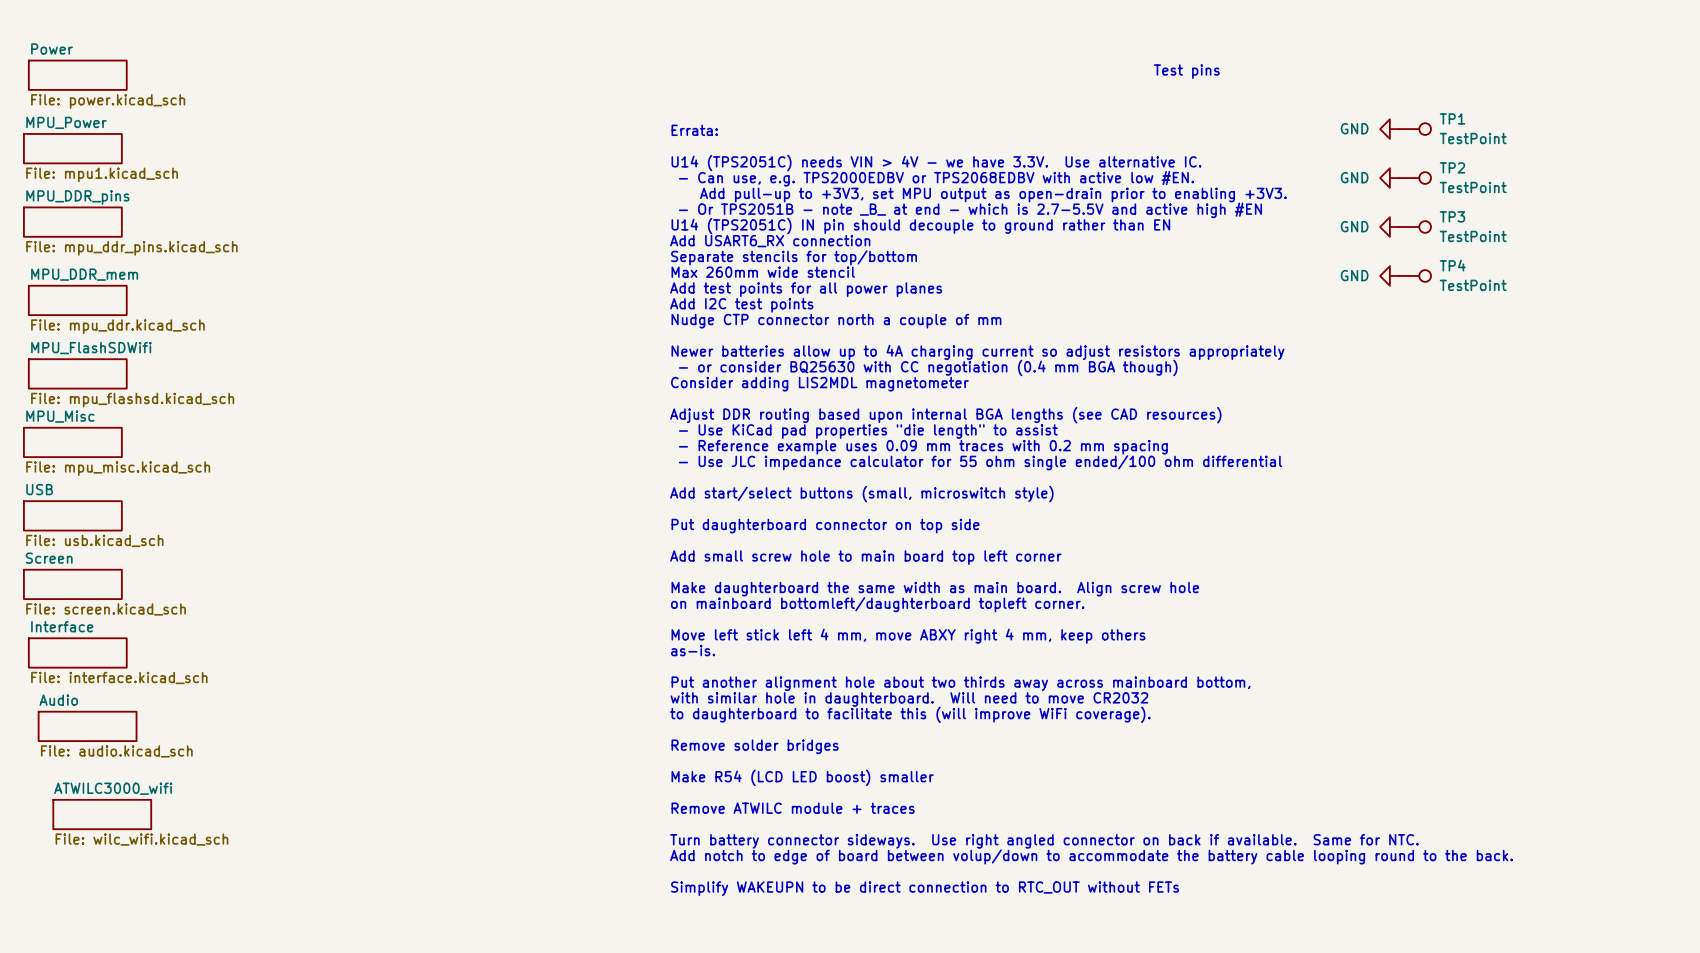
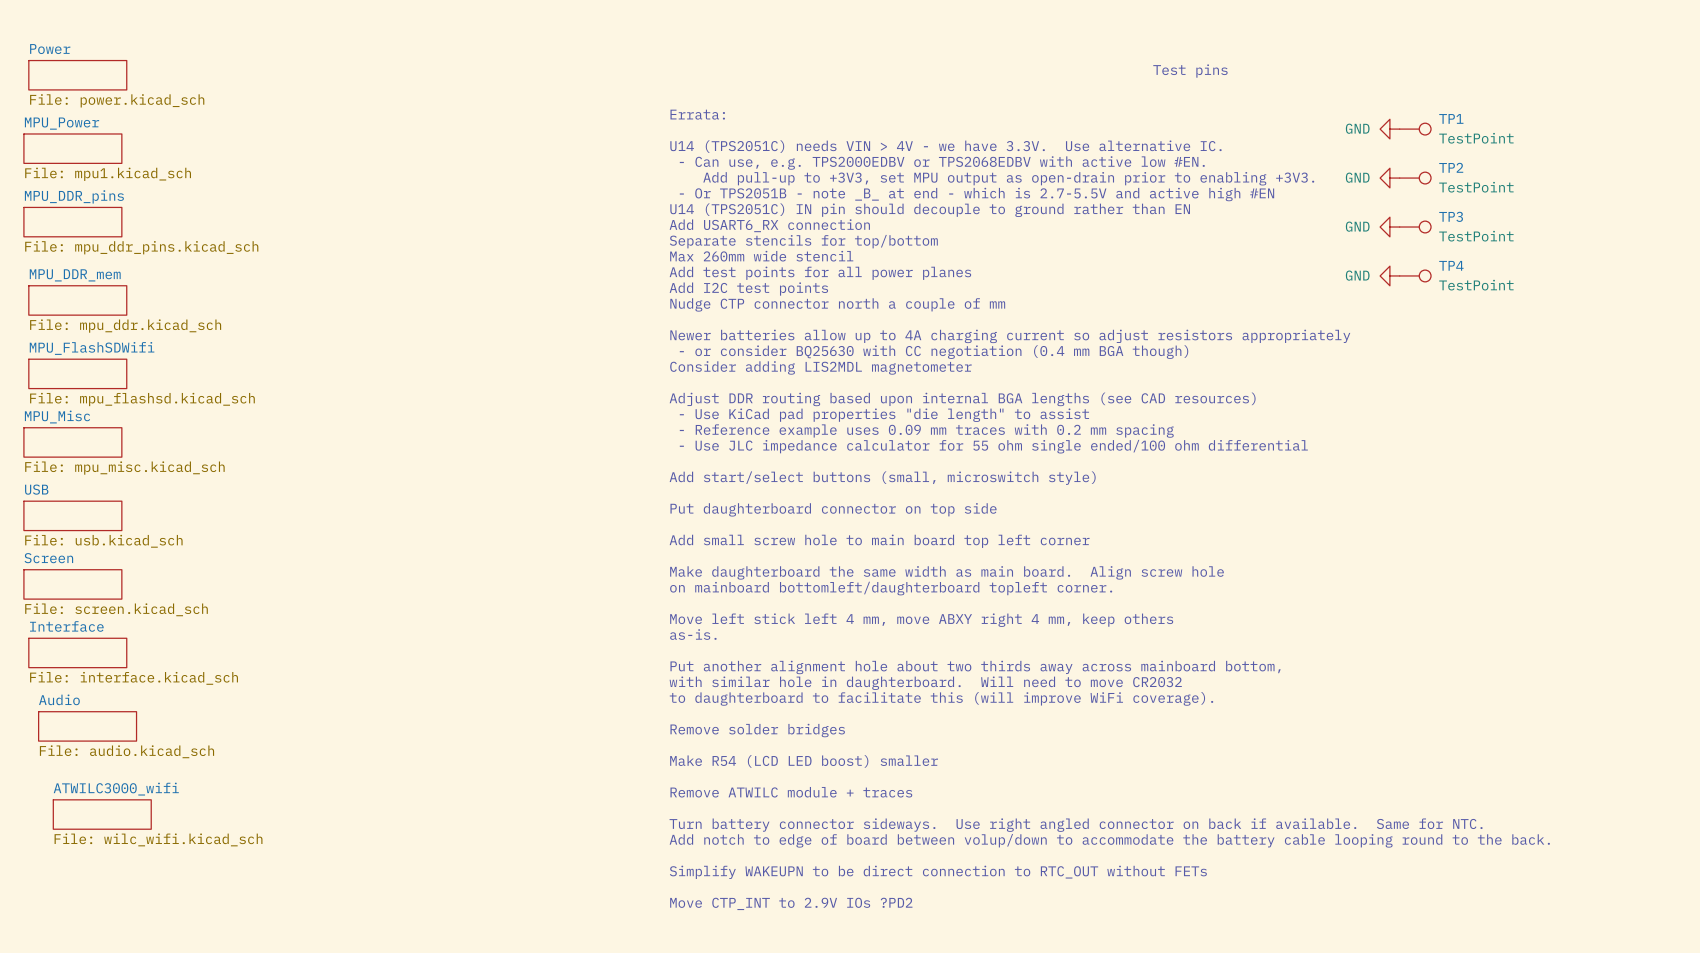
text position: Errata: (694, 130) -> Errata: (697, 114)
text: none -> U14 (TPS2051C) needs VIN > 4V - we have 3.3V. Use alternative IC. (945, 146)
text: U14 (TPS2051C) needs VIN > 4V - we have 3.3V. Use alternative IC. (936, 163) -> - Can use, e.g. TPS2000EDBV or TPS2068EDBV with active low #EN. (942, 162)
text: - Can use, e.g. TPS2000EDBV or TPS2068EDBV with active low #EN. (936, 178) -> Add pull-up to +3V3, set MPU output as open-drain prior to enabling +3V3. (1008, 178)
text: Add pull-up to +3V3, set MPU output as open-drain prior to enabling +3V3. (993, 195) -> - Or TPS2051B - note _B_ at end - which is 2.7-5.5V and active high #EN (976, 194)
text: - Or TPS2051B - note _B_ at end - which is 2.7-5.5V and active high #EN (970, 210) -> U14 (TPS2051C) IN pin should decouple to ground rather than EN (930, 210)
text: U14 (TPS2051C) IN pin should decouple to ground rather than EN (920, 226) -> Add USART6_RX connection (769, 225)
text: Add USART6_RX connection (770, 241) -> Separate stencils for top/bottom (803, 241)
text: Separate stencils for top/bottom (794, 257) -> Max 260mm wide stencil (761, 256)
text: Max 260mm wide stencil (763, 272) -> Add test points for all power planes (820, 273)
text: Add test points for all power planes (806, 289) -> Add I2C test points (748, 289)
text: Add I2C test points (741, 305) -> Nudge CTP connector north a couple of mm (837, 304)
text: Nudge CTP connector north a couple of mm (836, 321) -> none
text: none -> Newer batteries allow up to 4A charging current so adjust resistors appropriately (1010, 336)
text: Newer batteries allow up to 4A charging current so adjust resistors appropriately (977, 352) -> - or consider BQ25630 with CC negotiation (0.4 mm BGA though) (934, 352)
text: - or consider BQ25630 with CC negotiation (0.4 mm BGA though) (928, 367) -> Consider adding LIS2MDL magnetometer (820, 367)
text: Consider adding LIS2MDL magnetometer (819, 384) -> none
text: none -> Adjust DDR routing based upon internal BGA lengths (see CAD resources) (962, 399)
text: Adjust DDR routing based upon internal BGA lengths (see CAD resources) (945, 415) -> - Use KiCad pad properties "die length" to assist (884, 415)
text: - Use KiCad pad properties "die length" to assist (868, 431) -> - Reference example uses 0.09 mm traces with 0.2 mm spacing (926, 430)
text: - Reference example uses 0.09 mm traces with 0.2 mm spacing (923, 447) -> - Use JLC impedance calculator for 55 ohm single ended/100 ohm differential (993, 446)
text: - Use JLC impedance calculator for 55 ohm single ended/100 ohm differential (980, 462) -> none
text position: Add start/select buttons (small, microswitch style) (861, 494) -> Add start/select buttons (small, microswitch style) (882, 478)
text position: Put daughterboard connector on top side (825, 526) -> Put daughterboard connector on top side (833, 509)
text position: Add small screw hole to main board top left corner (865, 557) -> Add small screw hole to main board top left corner (879, 541)
text: none -> Make daughterboard the same width as main board. Align screw hole (947, 572)
text: Make daughterboard the same width as main board. Align screw hole (935, 589) -> on mainboard bottomleft/daughterboard topleft corner. (891, 588)
text: on mainboard bottomleft/daughterboard topleft corner. (877, 604) -> none
text: none -> Move left stick left 4 mm, move ABXY right 4 mm, keep others (921, 620)
text: Move left stick left 4 mm, move ABXY right 4 mm, keep others (908, 636) -> as-is. (693, 634)
text: as-is. (693, 650) -> none
text: none -> Put another alignment hole about two thirds away across mainboard bottom, (975, 667)
text: Put another alignment hole about two thirds away across mainboard bottom, (960, 683) -> with similar hole in daughterboard. Will need to move CR2032 (925, 683)
text: with similar hole in daughterboard. Will need to move CR2032 (909, 699) -> to daughterboard to facilitate this (will improve WiFi coverage). (941, 698)
text: to daughterboard to facilitate this (will improve WiFi coverage). (910, 714) -> none
text position: Remove solder bridges (755, 746) -> Remove solder bridges (757, 730)
text position: Make R54 (LCD LED boost) smaller (802, 777) -> Make R54 (LCD LED boost) smaller (804, 761)
text position: Remove ATWILC module + traces (793, 808) -> Remove ATWILC module + traces (791, 792)
text: none -> Turn battery connector sideways. Use right angled connector on back if available. Same for NTC. (1076, 825)
text: Turn battery connector sideways. Use right angled connector on back if available. Same for NTC. (1044, 841) -> Add notch to edge of board between volup/down to accommodate the battery cable looping round to the back. (1109, 840)
text: Add notch to edge of board between volup/down to accommodate the battery cable looping round to the back. (1091, 856) -> none
text position: Simplify WAKEUPN to be direct connection to RTC_OUT without FETs (925, 888) -> Simplify WAKEUPN to be direct connection to RTC_OUT without FETs (938, 872)
text: none -> Move CTP_INT to 2.9V IOs ?PD2 (791, 903)

